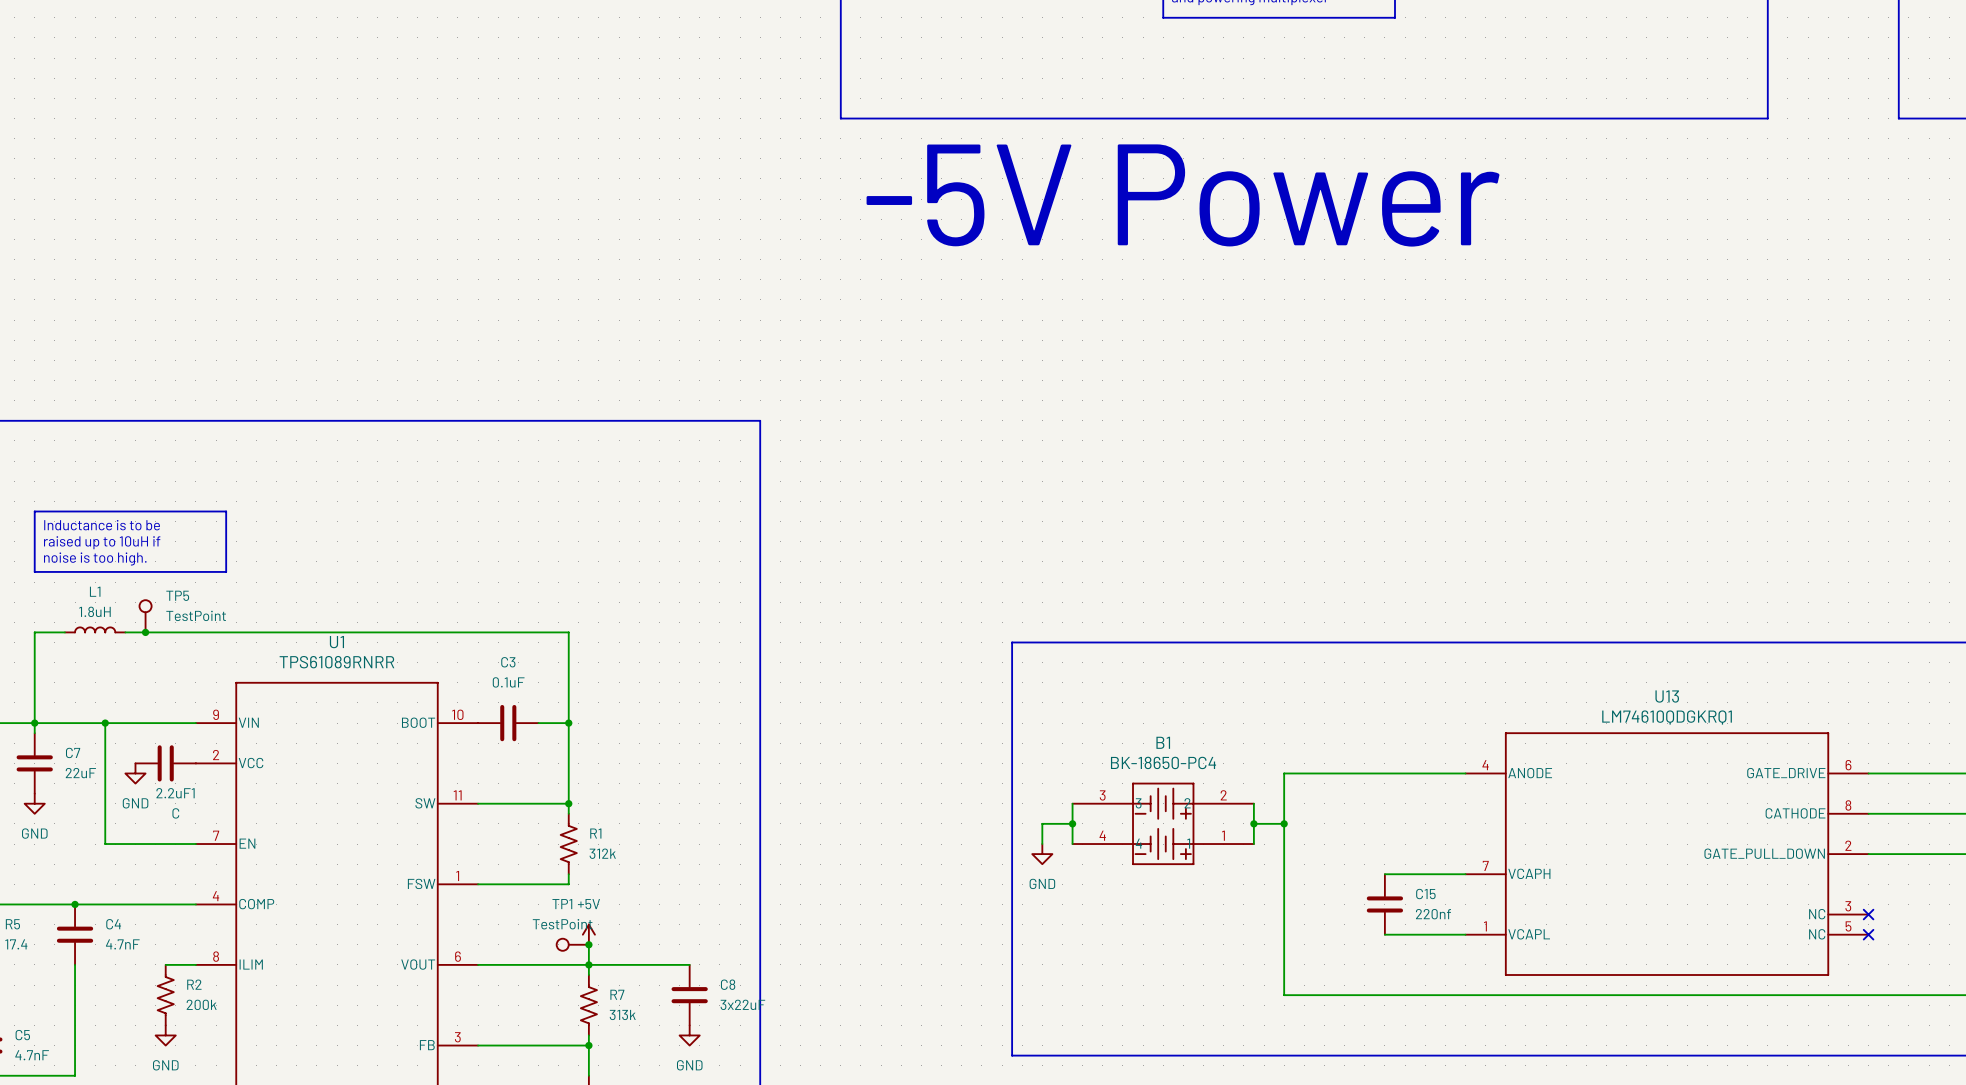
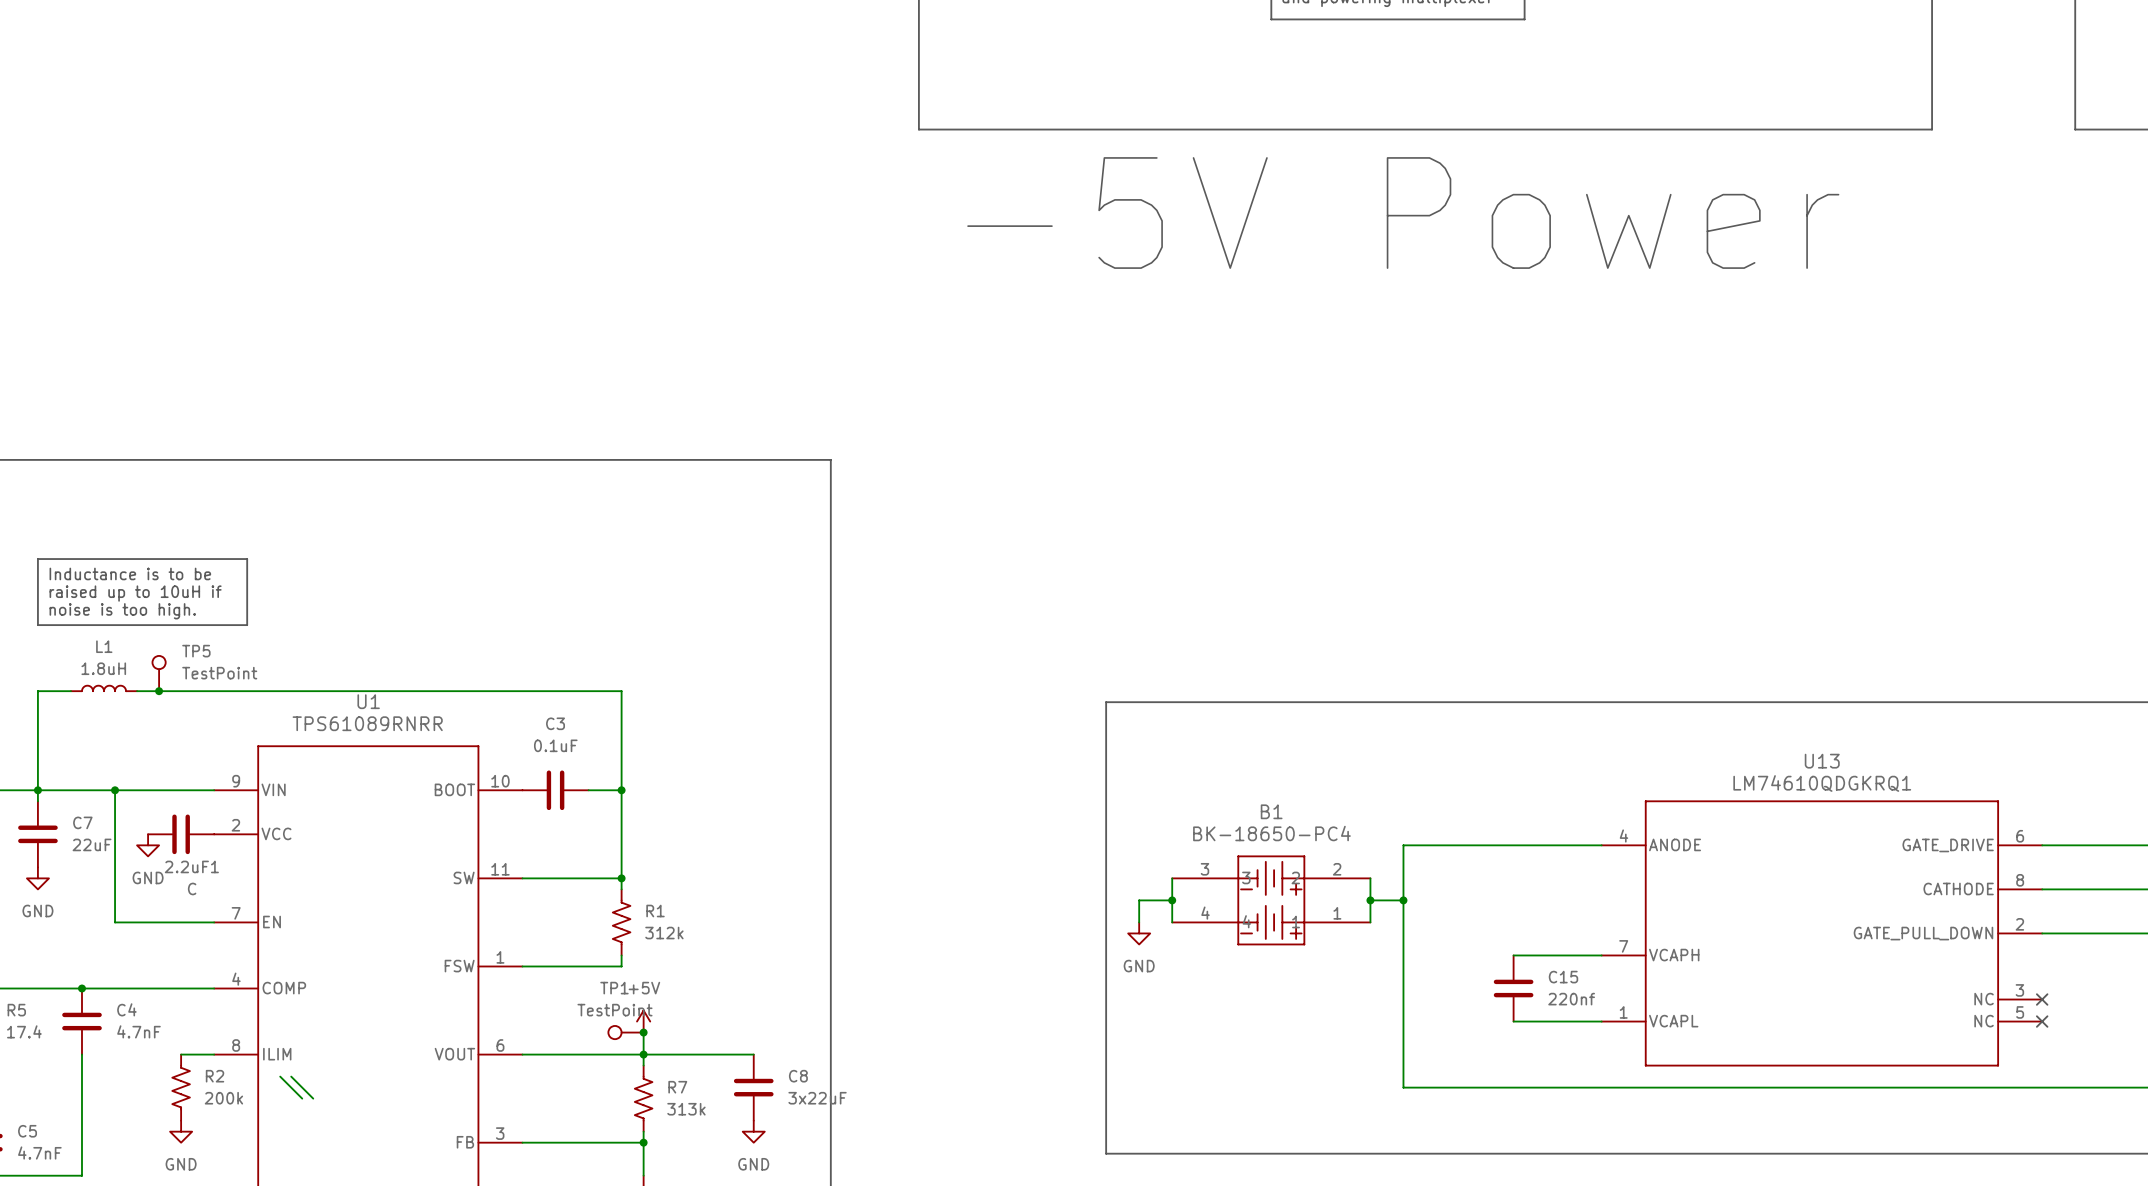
wire: none -> (280, 1076) (302, 1098)
wire: none -> (291, 1076) (313, 1098)

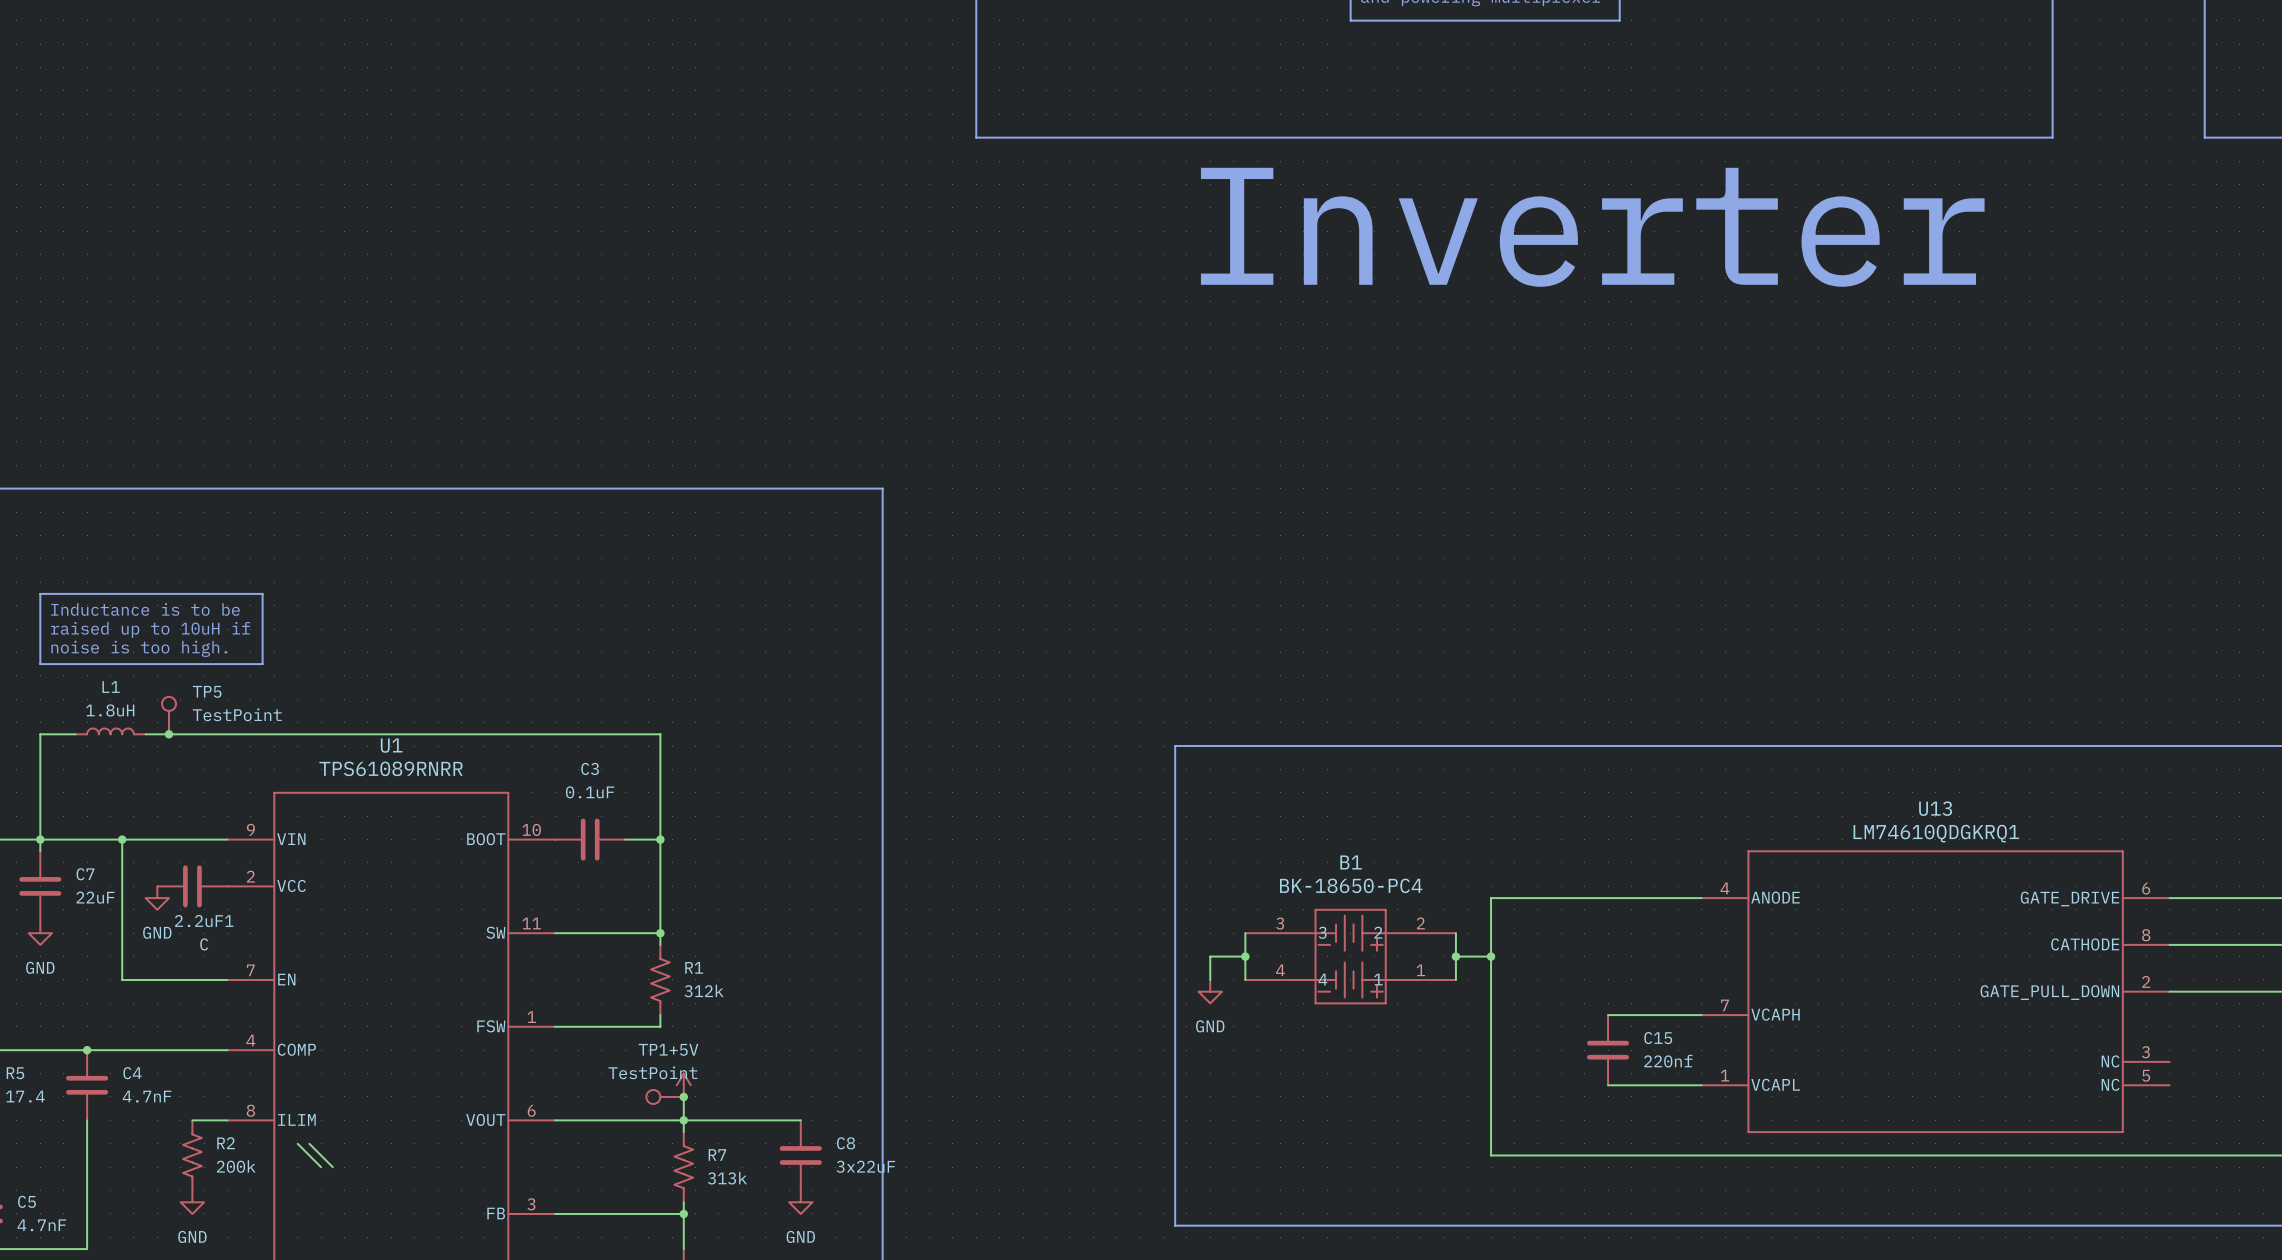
text: -5V Power (1403, 213) -> none
text: none -> Inverter (1592, 227)
no-connect mark: (2042, 999) -> none
no-connect mark: (2042, 1021) -> none

